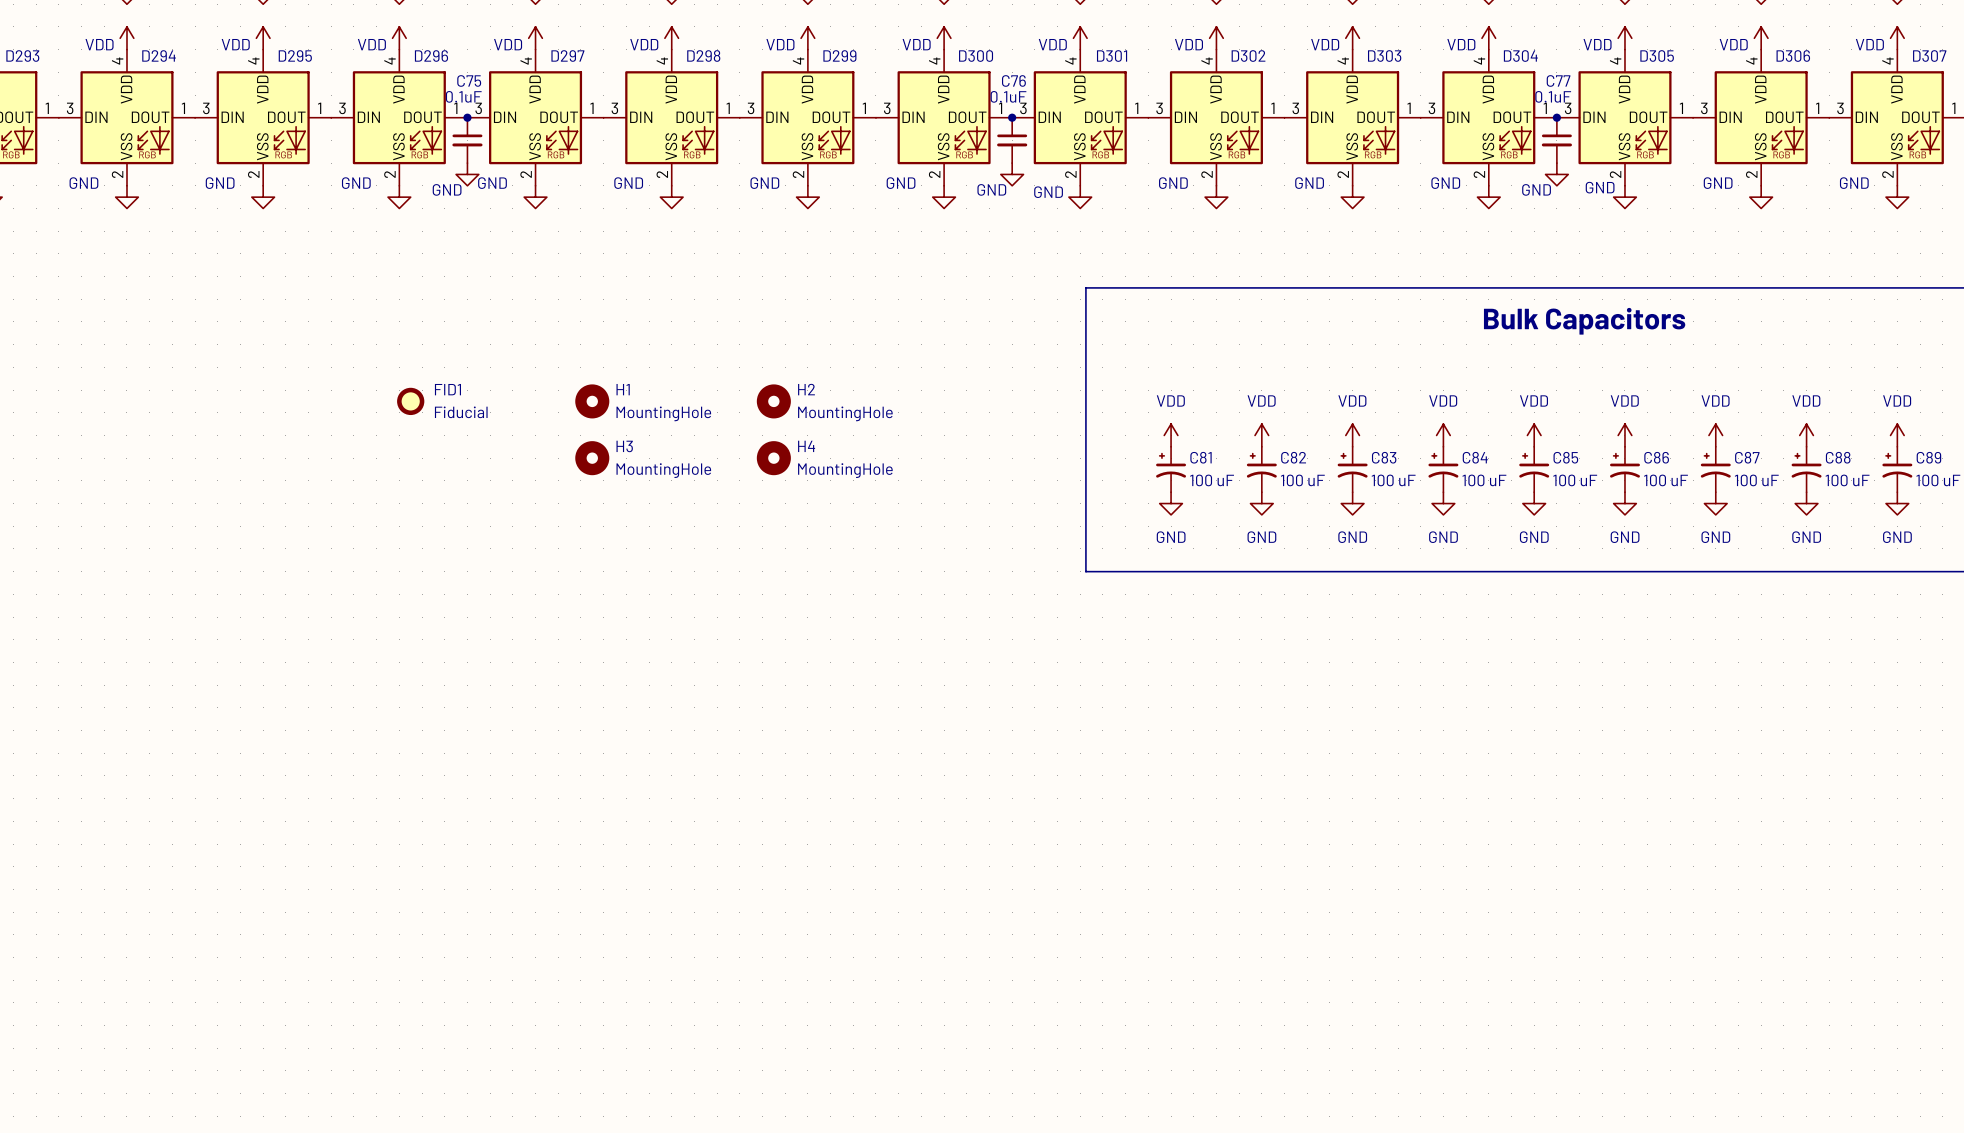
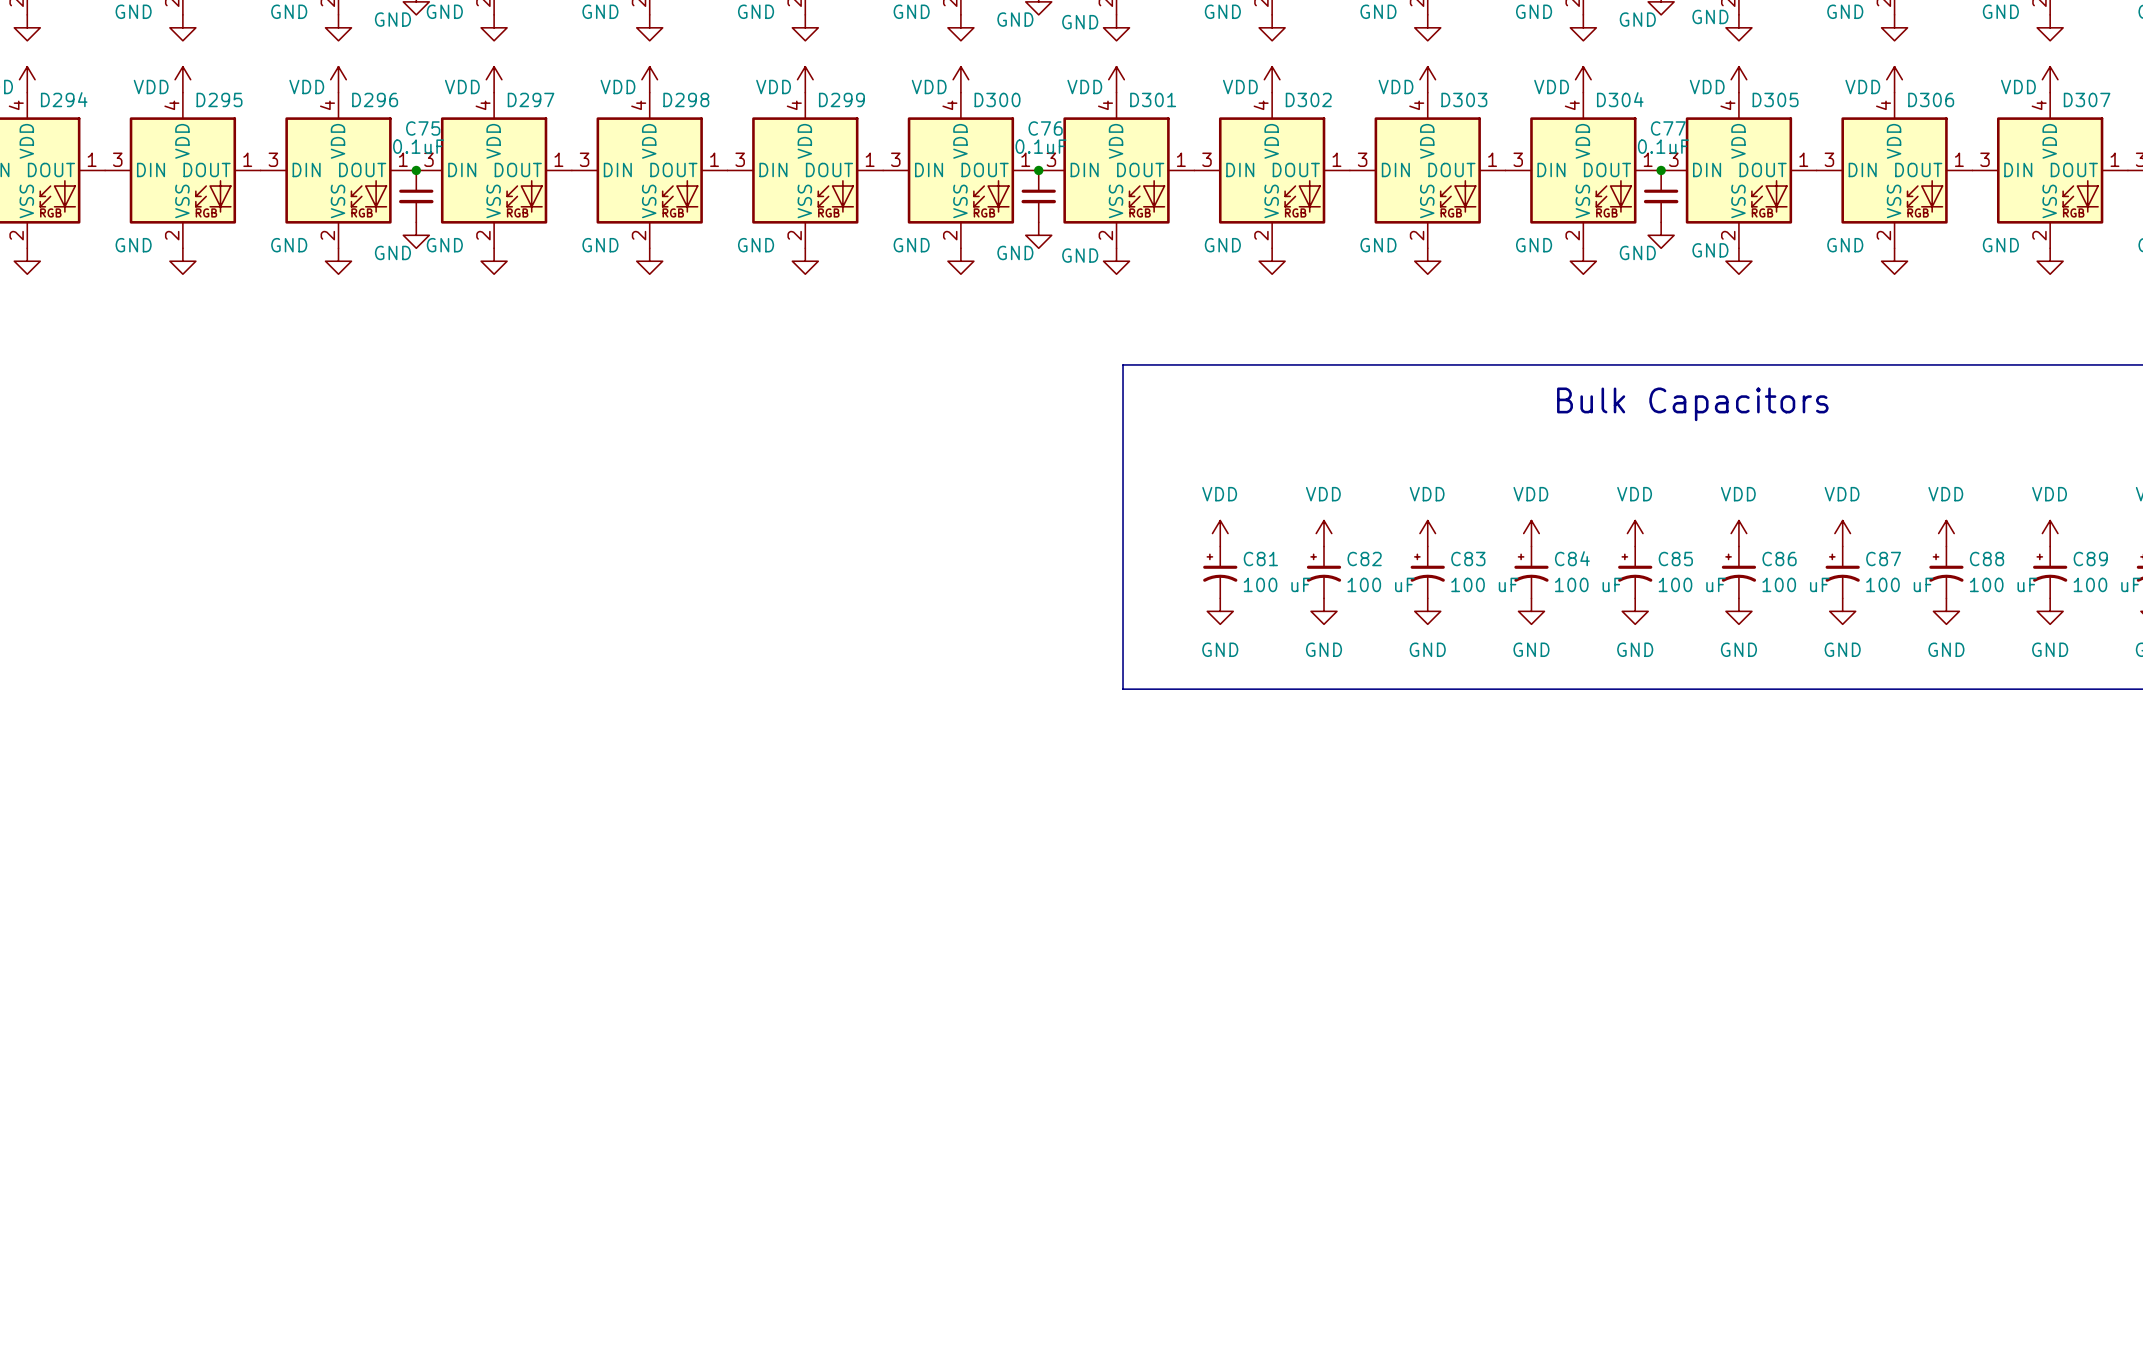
FID1: Fiducial (410, 401) -> none
H1: MountingHole (592, 401) -> none
H2: MountingHole (773, 401) -> none
H3: MountingHole (592, 458) -> none
H4: MountingHole (773, 458) -> none

